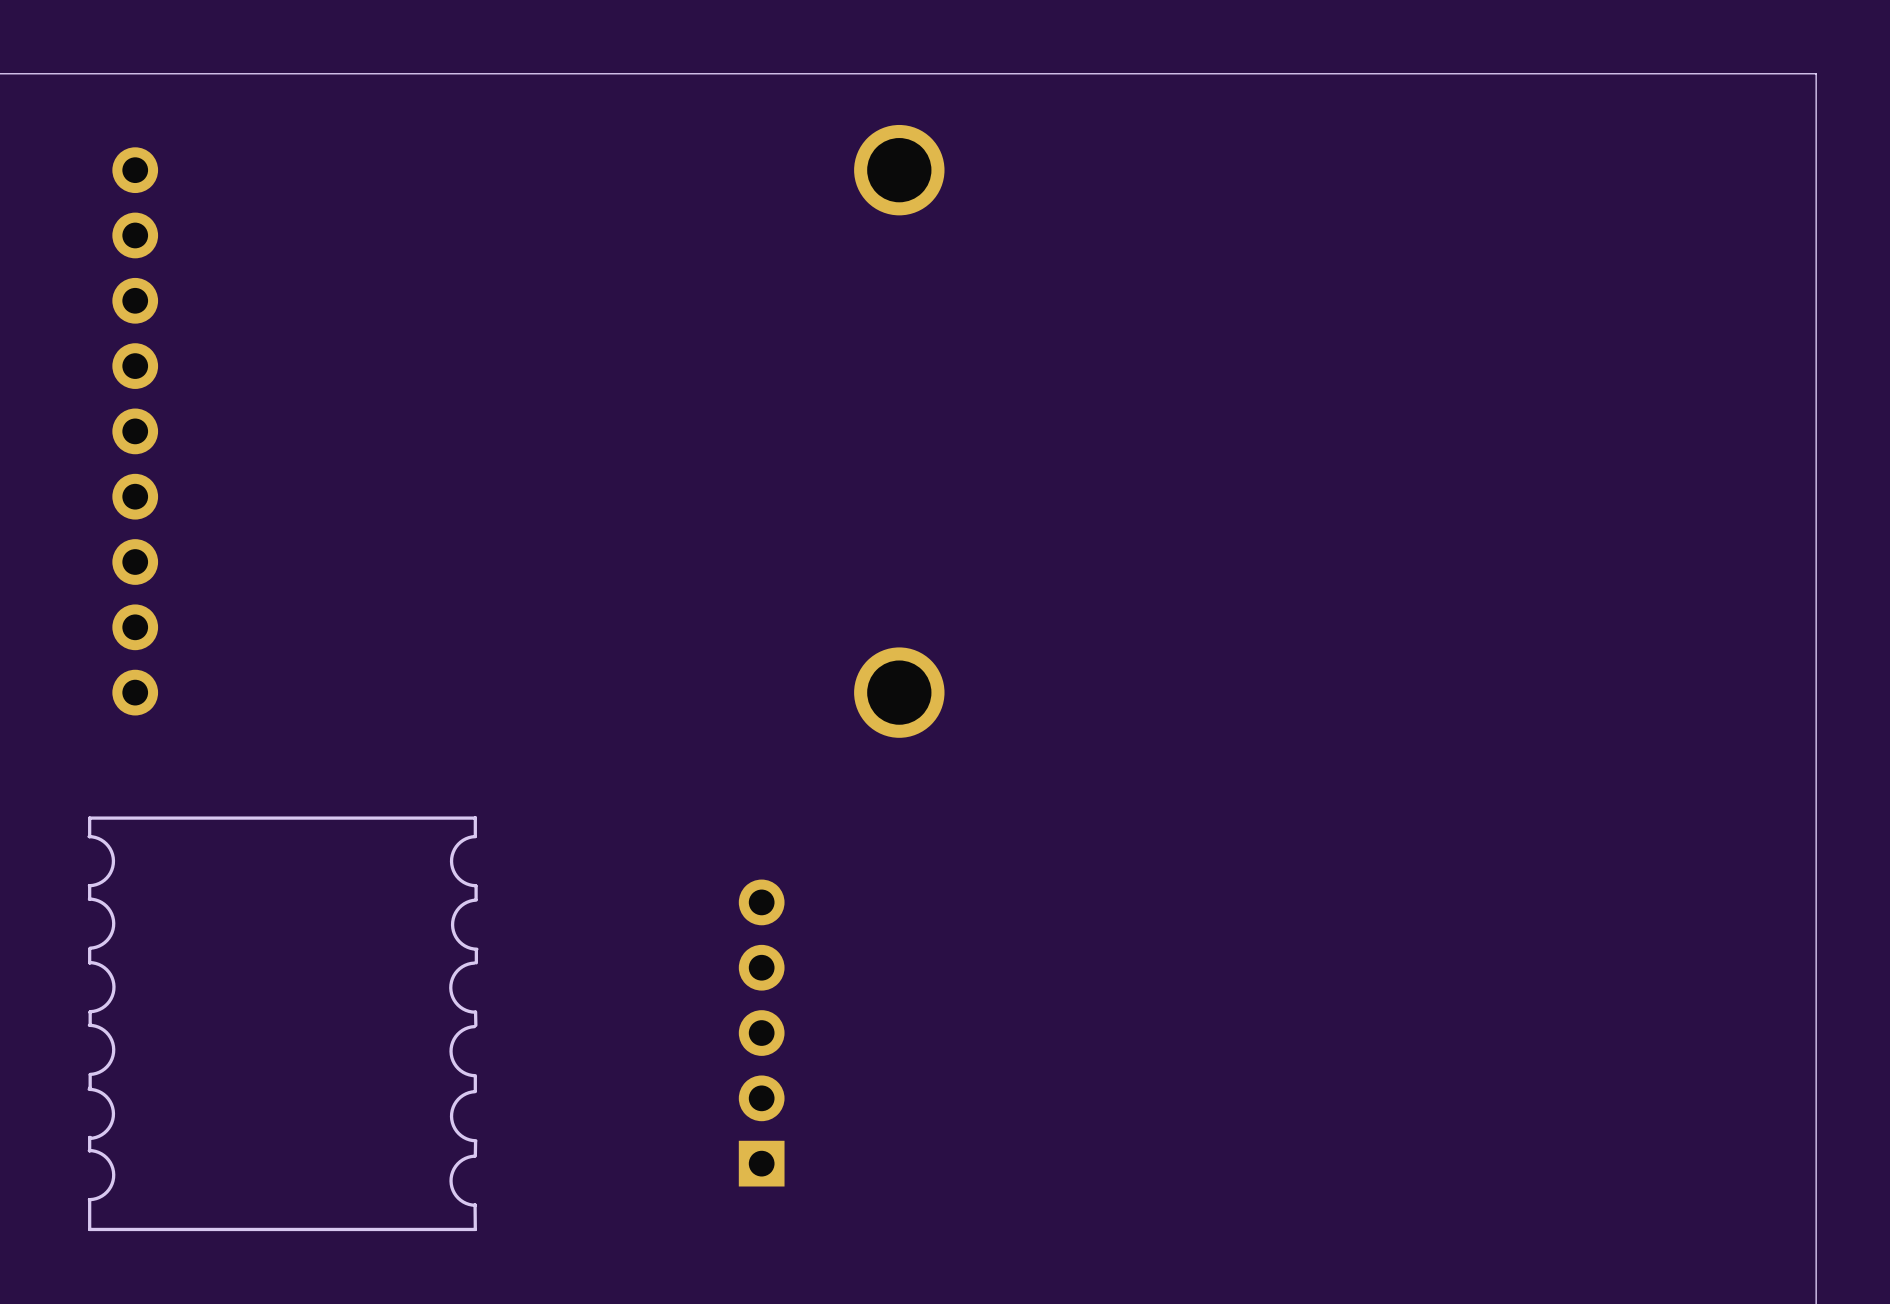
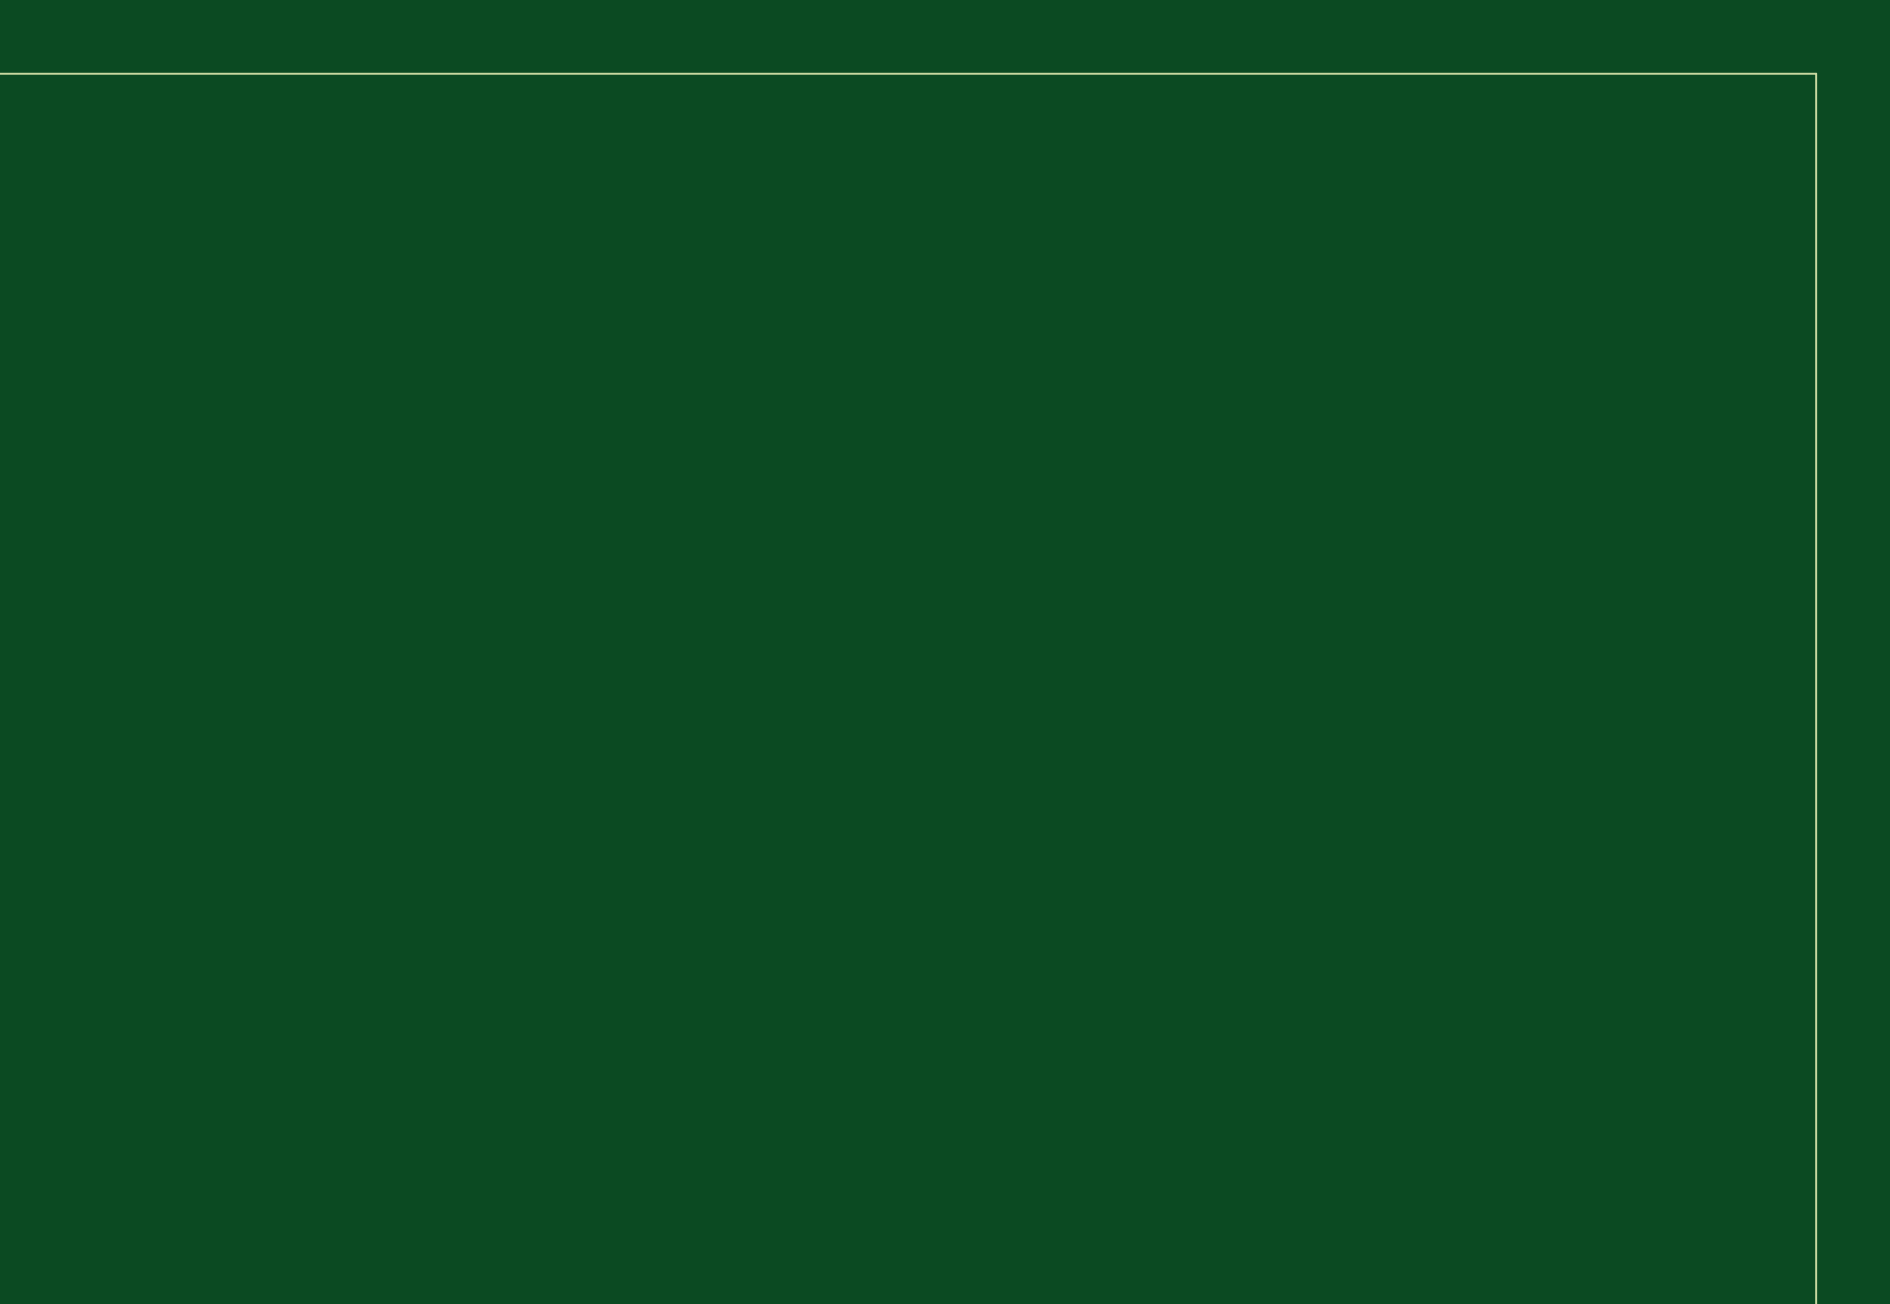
part: (899, 170) -> none
part: (135, 431) -> none
part: (899, 692) -> none
part: (283, 1023) -> none
part: (761, 1033) -> none

